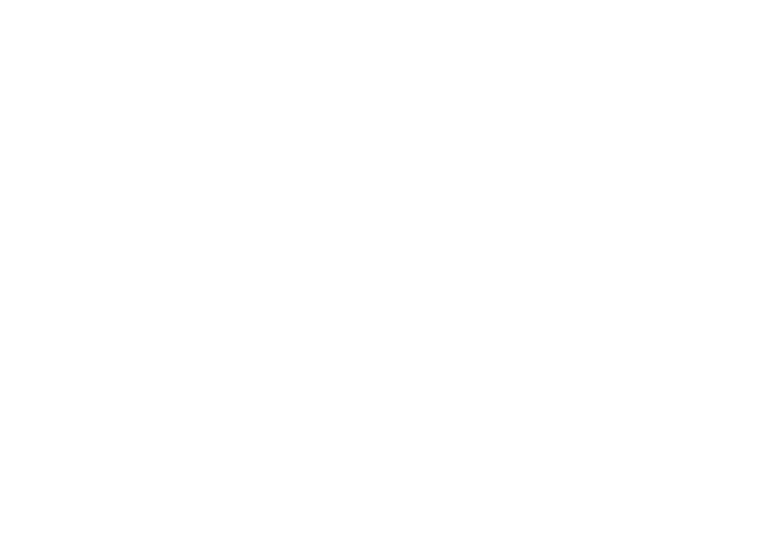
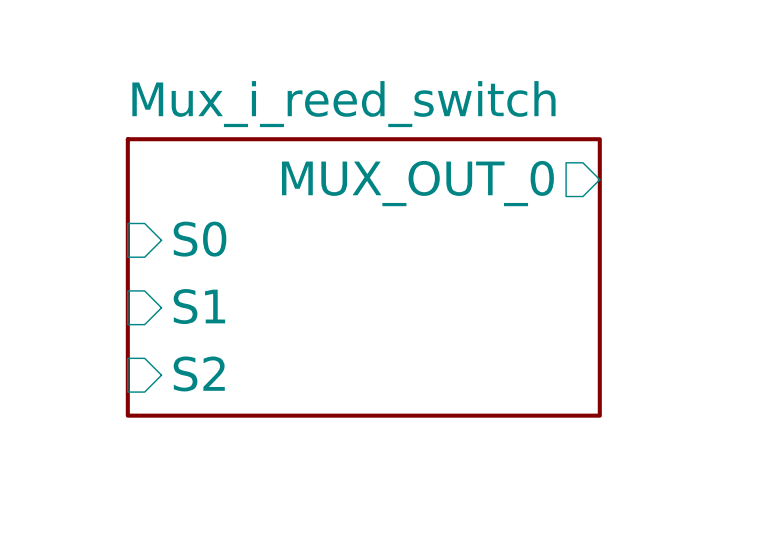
sheet pin: none -> MUX_OUT_0 (417, 183)
sheet pin: none -> S0 (200, 239)
sheet Mux_i_reed_switch: none -> (363, 277)
sheet pin: none -> S1 (199, 306)
sheet pin: none -> S2 (199, 373)

